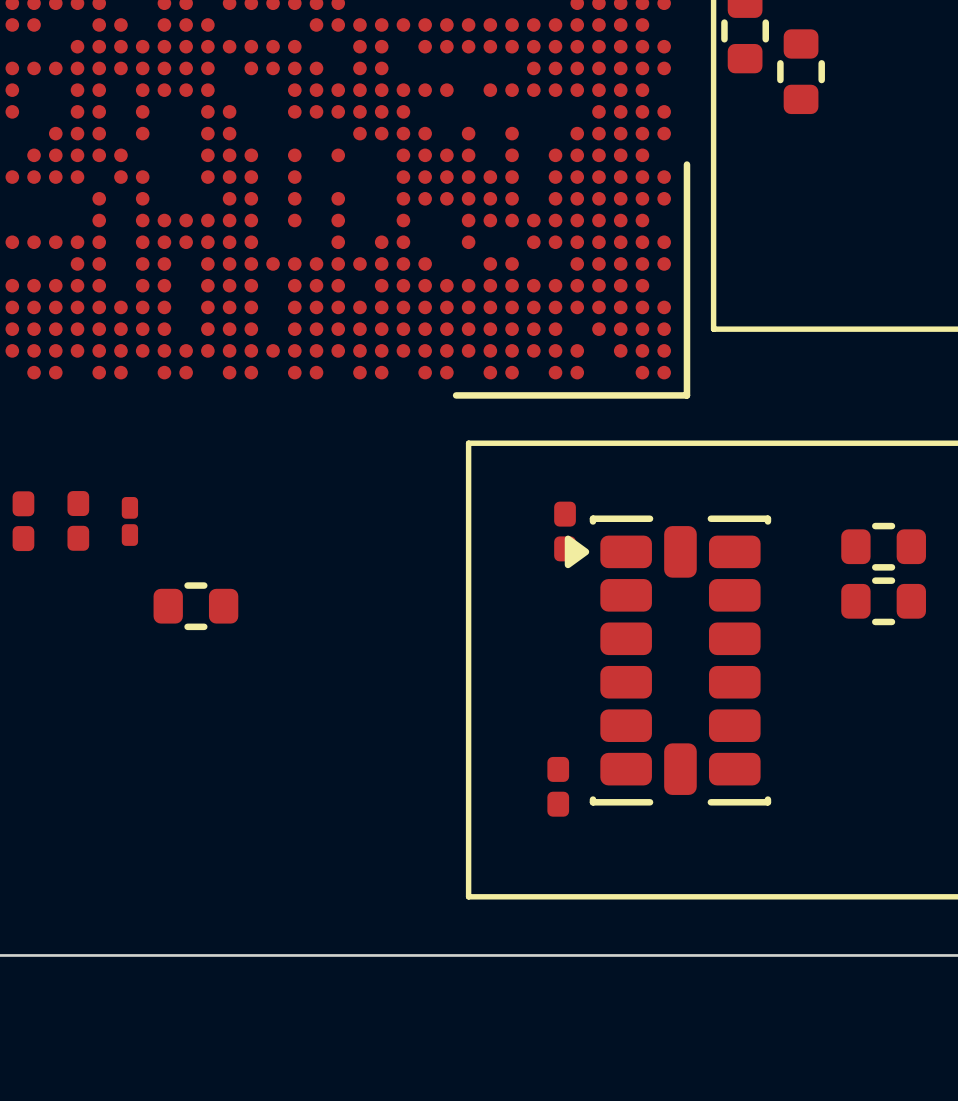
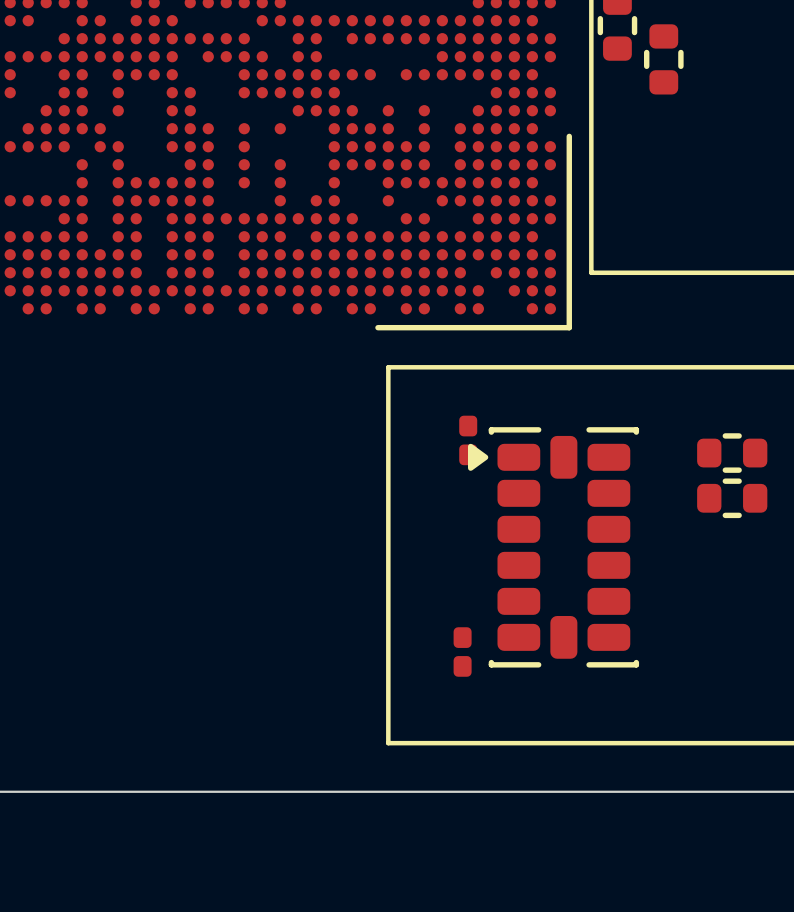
part: (78, 520) -> none
part: (23, 521) -> none
part: (129, 521) -> none
part: (195, 606) -> none

